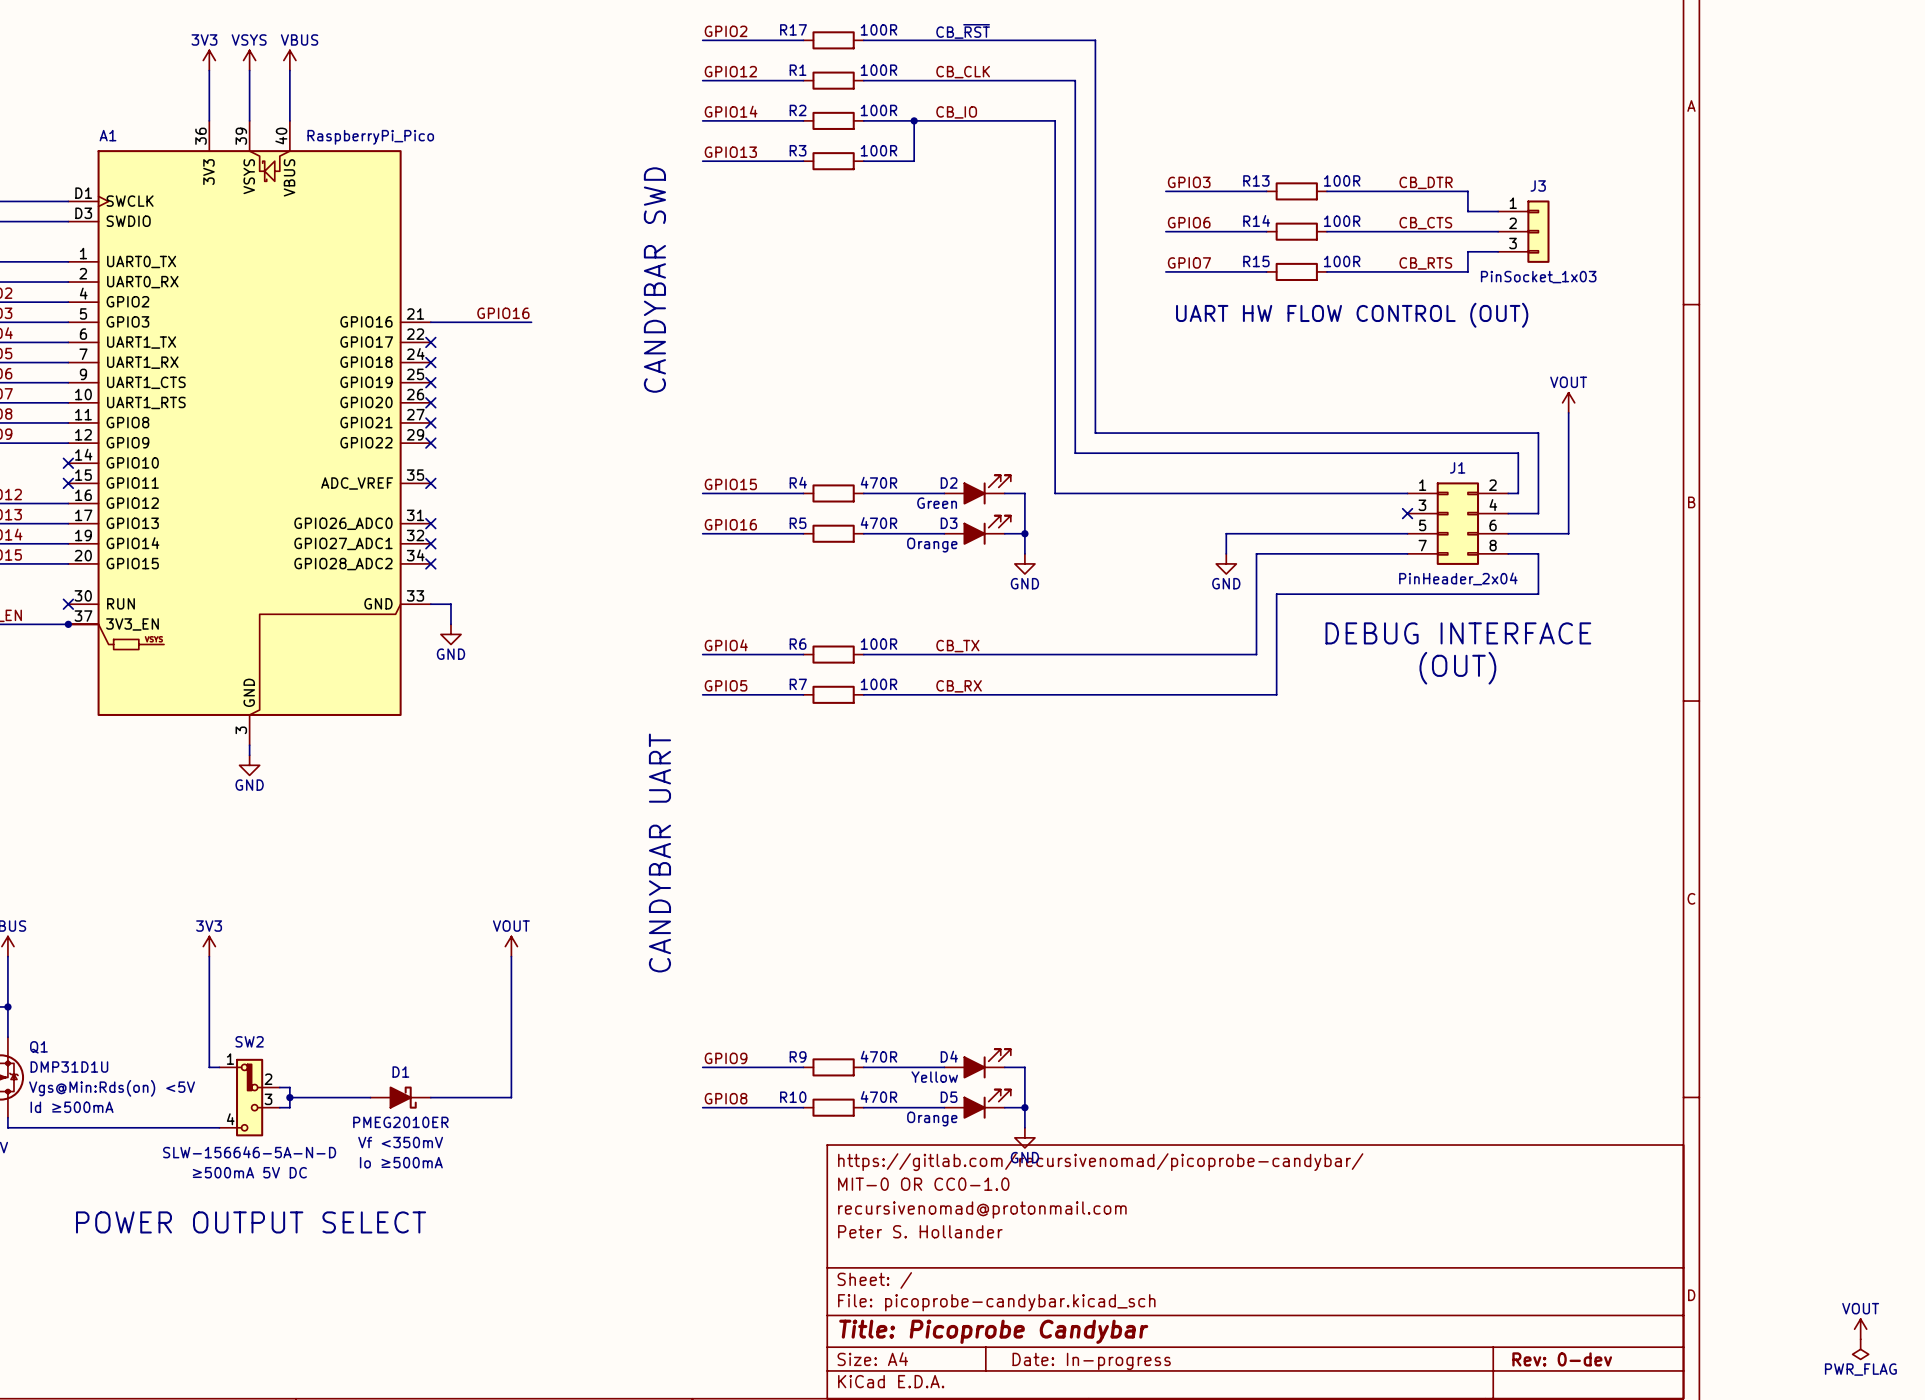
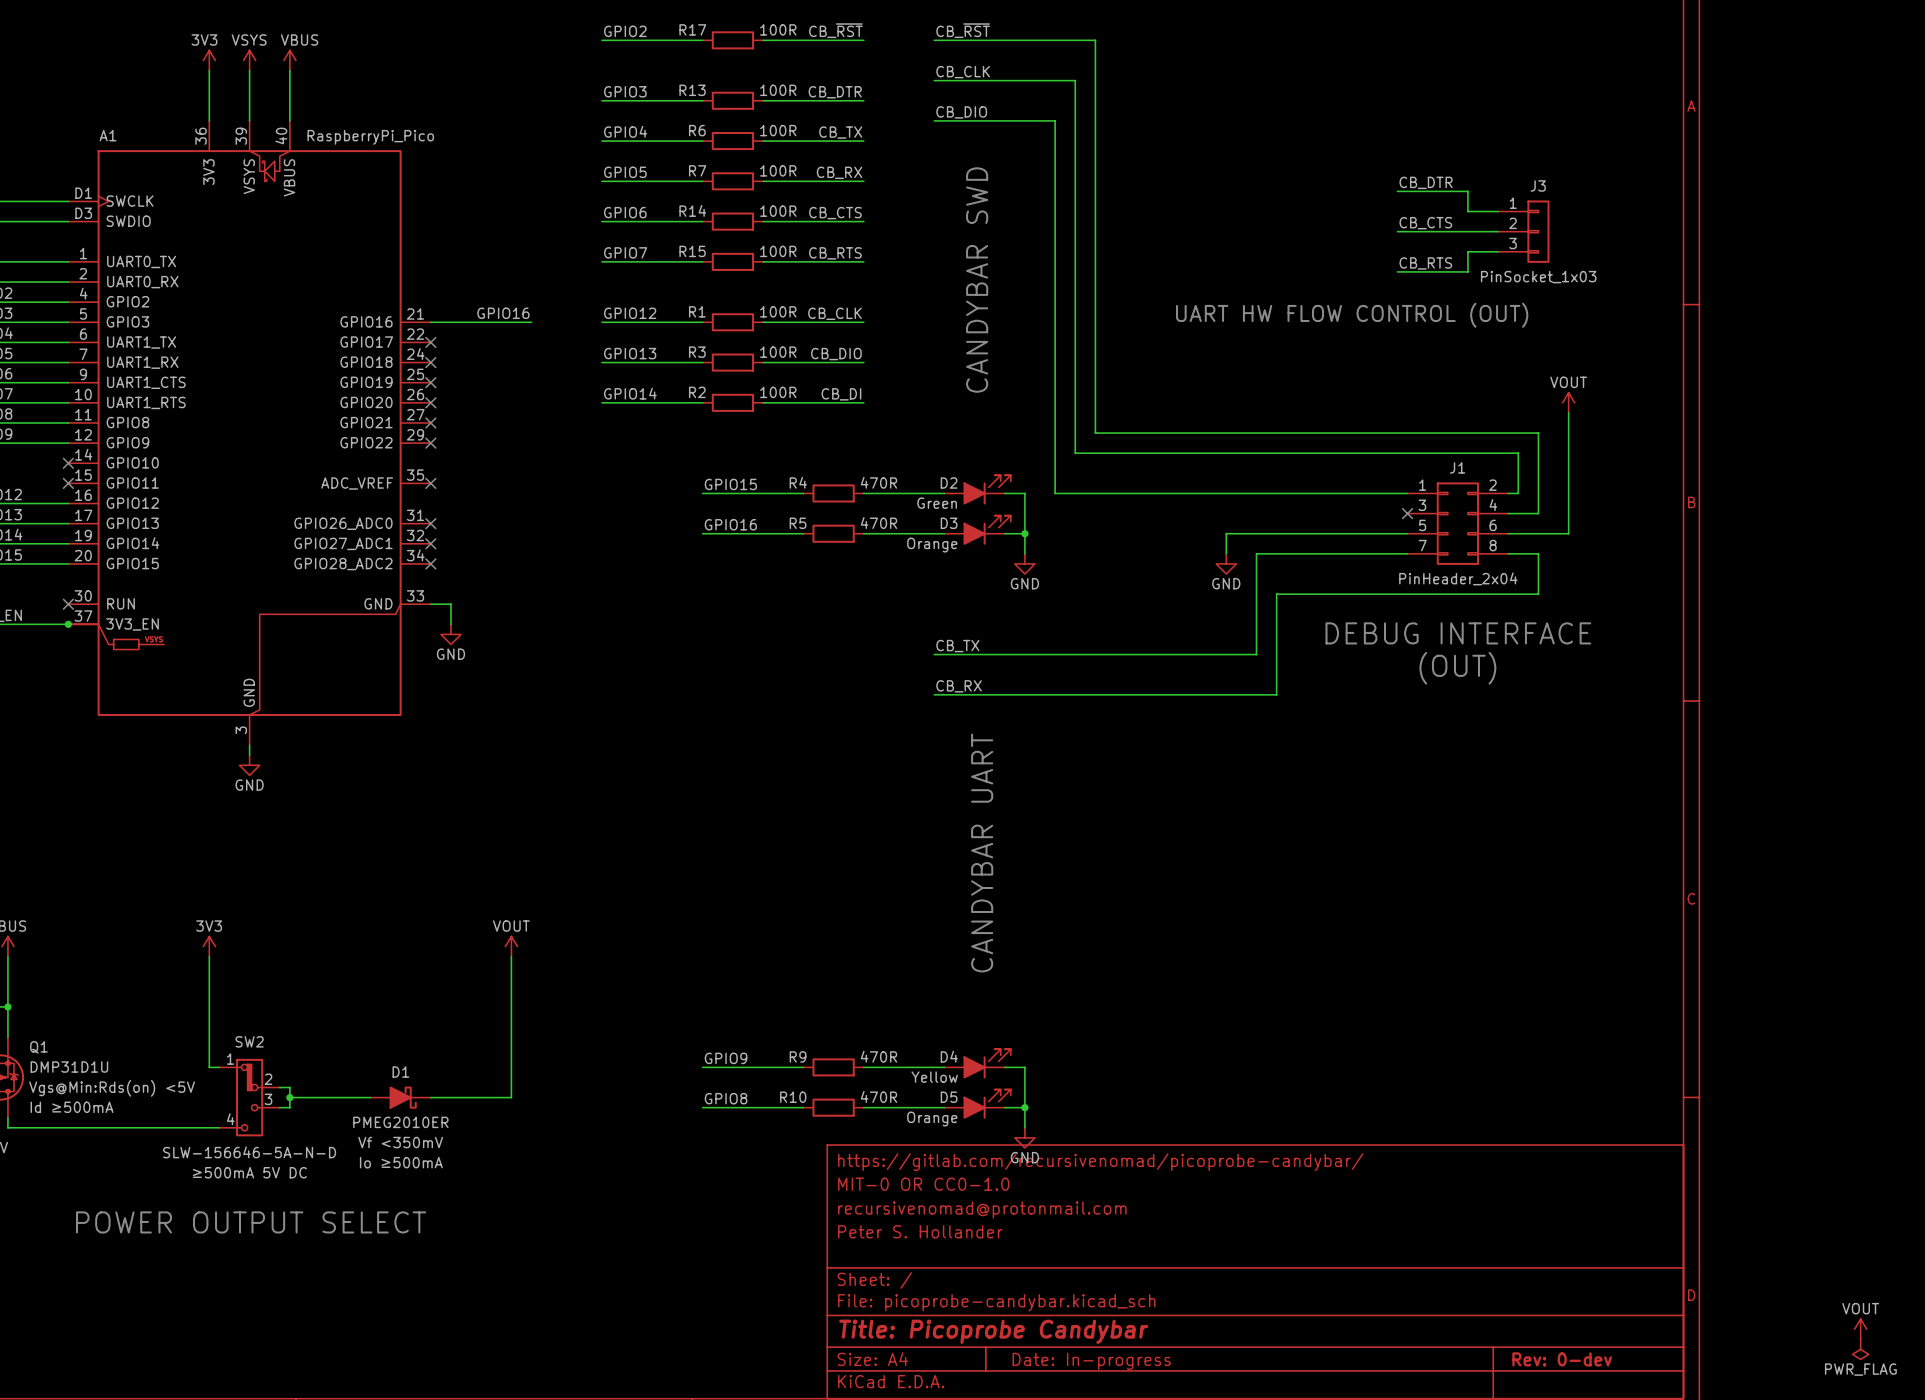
label: none -> CB_~{RST} (835, 30)
label: none -> CB_~{RST} (963, 30)
label position: GPIO2 (726, 31) -> GPIO2 (625, 31)
text: CB_~{RST} (963, 31) -> none
wire: (702, 40) (763, 40) -> (702, 40) (602, 40)
R17 position: (833, 40) -> (732, 40)
wire: (863, 40) (934, 40) -> (863, 40) (803, 40)
label: GPIO12 (730, 71) -> none
wire: (702, 80) (803, 80) -> (763, 100) (863, 100)
R1 position: (833, 80) -> (732, 322)
wire: (863, 80) (934, 80) -> none
label: none -> GPIO3 (625, 91)
label: none -> CB_DTR (835, 92)
wire: none -> (602, 100) (702, 100)
label: GPIO14 (731, 111) -> none
label: CB_IO (956, 112) -> CB_DIO (961, 112)
wire: (702, 120) (803, 120) -> (763, 141) (863, 141)
R2 position: (833, 120) -> (732, 402)
wire: (863, 120) (934, 120) -> none
wire: (914, 120) (914, 161) (863, 161) -> none
junction: (914, 120) -> none
label: none -> GPIO4 (625, 131)
label: none -> CB_TX (840, 132)
wire: none -> (602, 141) (702, 141)
label: GPIO13 (730, 152) -> none
wire: (702, 161) (803, 161) -> (763, 181) (863, 181)
R3 position: (833, 161) -> (732, 362)
label: none -> GPIO5 (625, 172)
label: none -> CB_RX (839, 172)
wire: none -> (602, 181) (702, 181)
label: GPIO3 (1189, 182) -> none
wire: (1165, 191) (1266, 191) -> none
R13 position: (1296, 191) -> (732, 100)
wire: (1326, 191) (1397, 191) -> none
label: none -> GPIO6 (625, 212)
label: none -> CB_CTS (835, 213)
wire: none -> (602, 221) (702, 221)
wire: none -> (763, 221) (863, 221)
label: GPIO6 (1189, 222) -> none
wire: (1165, 231) (1266, 231) -> none
R14 position: (1296, 231) -> (732, 221)
wire: (1326, 231) (1397, 231) -> none
label: none -> GPIO7 (625, 252)
label: none -> CB_RTS (835, 253)
wire: none -> (602, 261) (702, 261)
wire: none -> (763, 261) (863, 261)
label: GPIO7 (1189, 262) -> none
wire: (1165, 271) (1266, 271) -> none
R15 position: (1296, 271) -> (732, 261)
wire: (1326, 271) (1397, 271) -> none
text: CANDYBAR SWD (654, 280) -> none
text: none -> CANDYBAR SWD (977, 280)
label: none -> GPIO12 (630, 313)
label: none -> CB_CLK (834, 313)
wire: none -> (602, 322) (702, 322)
wire: none -> (763, 322) (863, 322)
label: none -> GPIO13 (630, 353)
label: none -> CB_DIO (836, 354)
wire: none -> (602, 362) (702, 362)
wire: none -> (763, 362) (863, 362)
label: none -> GPIO14 (630, 393)
label: none -> CB_DI (841, 394)
wire: none -> (602, 402) (702, 402)
wire: none -> (763, 402) (863, 402)
label: GPIO4 (726, 645) -> none
wire: (702, 654) (803, 654) -> none
R6 position: (833, 654) -> (732, 141)
wire: (863, 654) (934, 654) -> none
label: GPIO5 (726, 685) -> none
wire: (702, 694) (803, 694) -> none
R7 position: (833, 694) -> (732, 181)
wire: (863, 694) (934, 694) -> none
text: CANDYBAR UART (659, 853) -> none
text: none -> CANDYBAR UART (982, 853)

